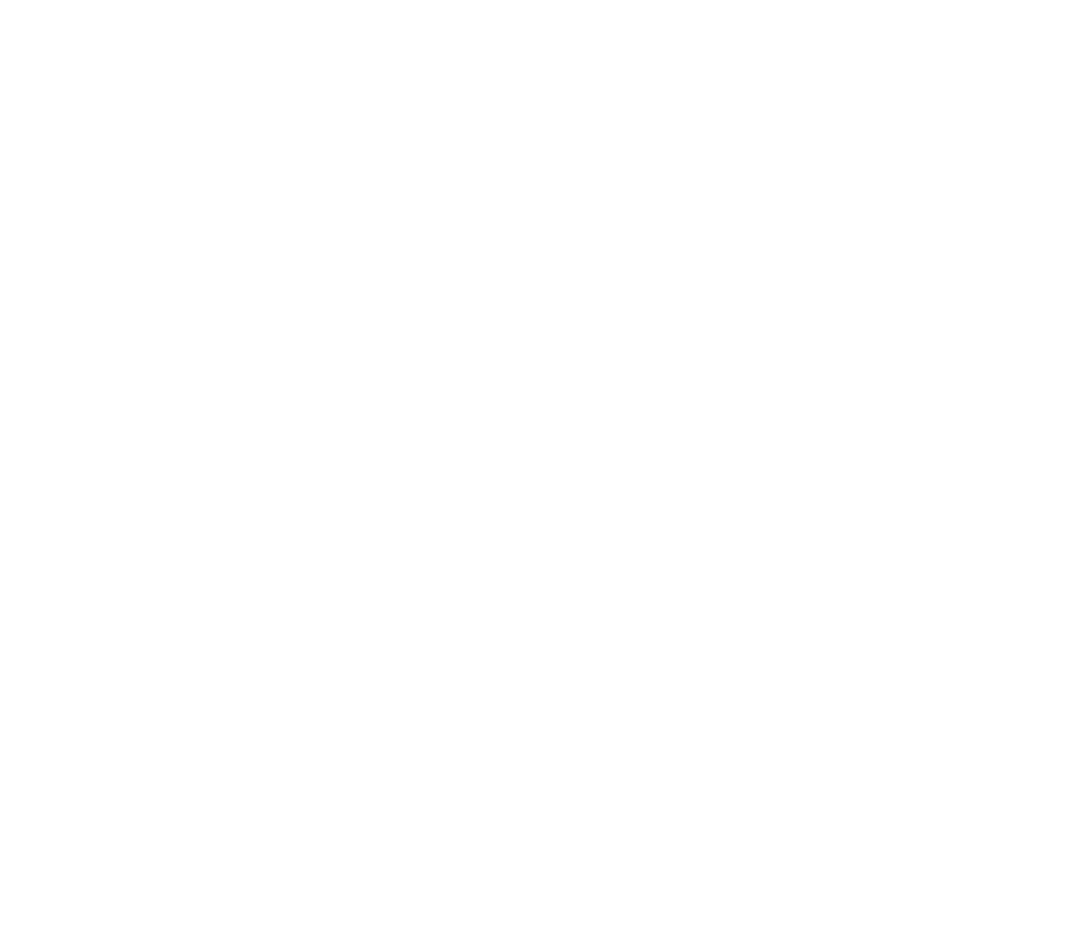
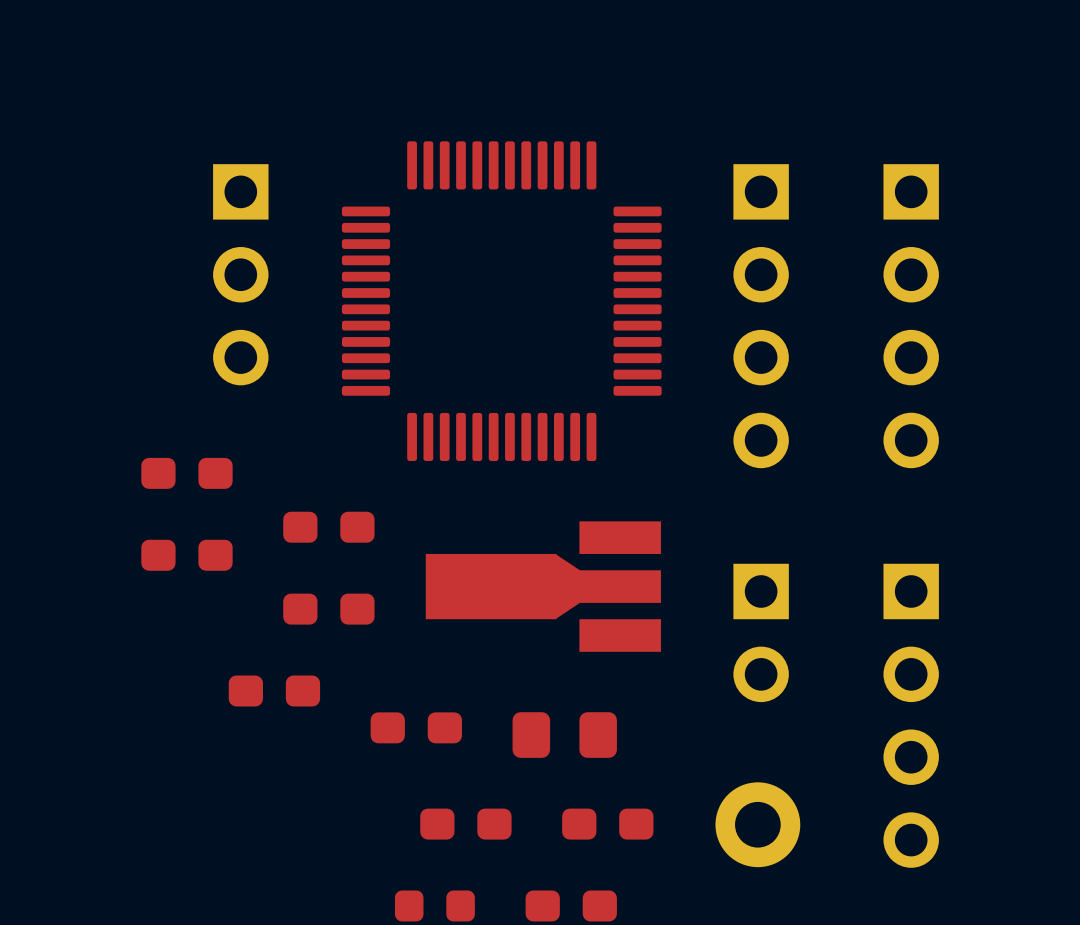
part: none -> (240, 274)
part: none -> (501, 301)
part: none -> (761, 316)
part: none -> (911, 316)
part: none -> (186, 473)
part: none -> (328, 527)
part: none -> (186, 555)
part: none -> (543, 586)
part: none -> (328, 609)
part: none -> (761, 632)
part: none -> (274, 690)
part: none -> (911, 715)
part: none -> (416, 727)
part: none -> (564, 735)
part: none -> (465, 824)
part: none -> (607, 824)
part: none -> (757, 824)
part: none -> (434, 905)
part: none -> (571, 905)

